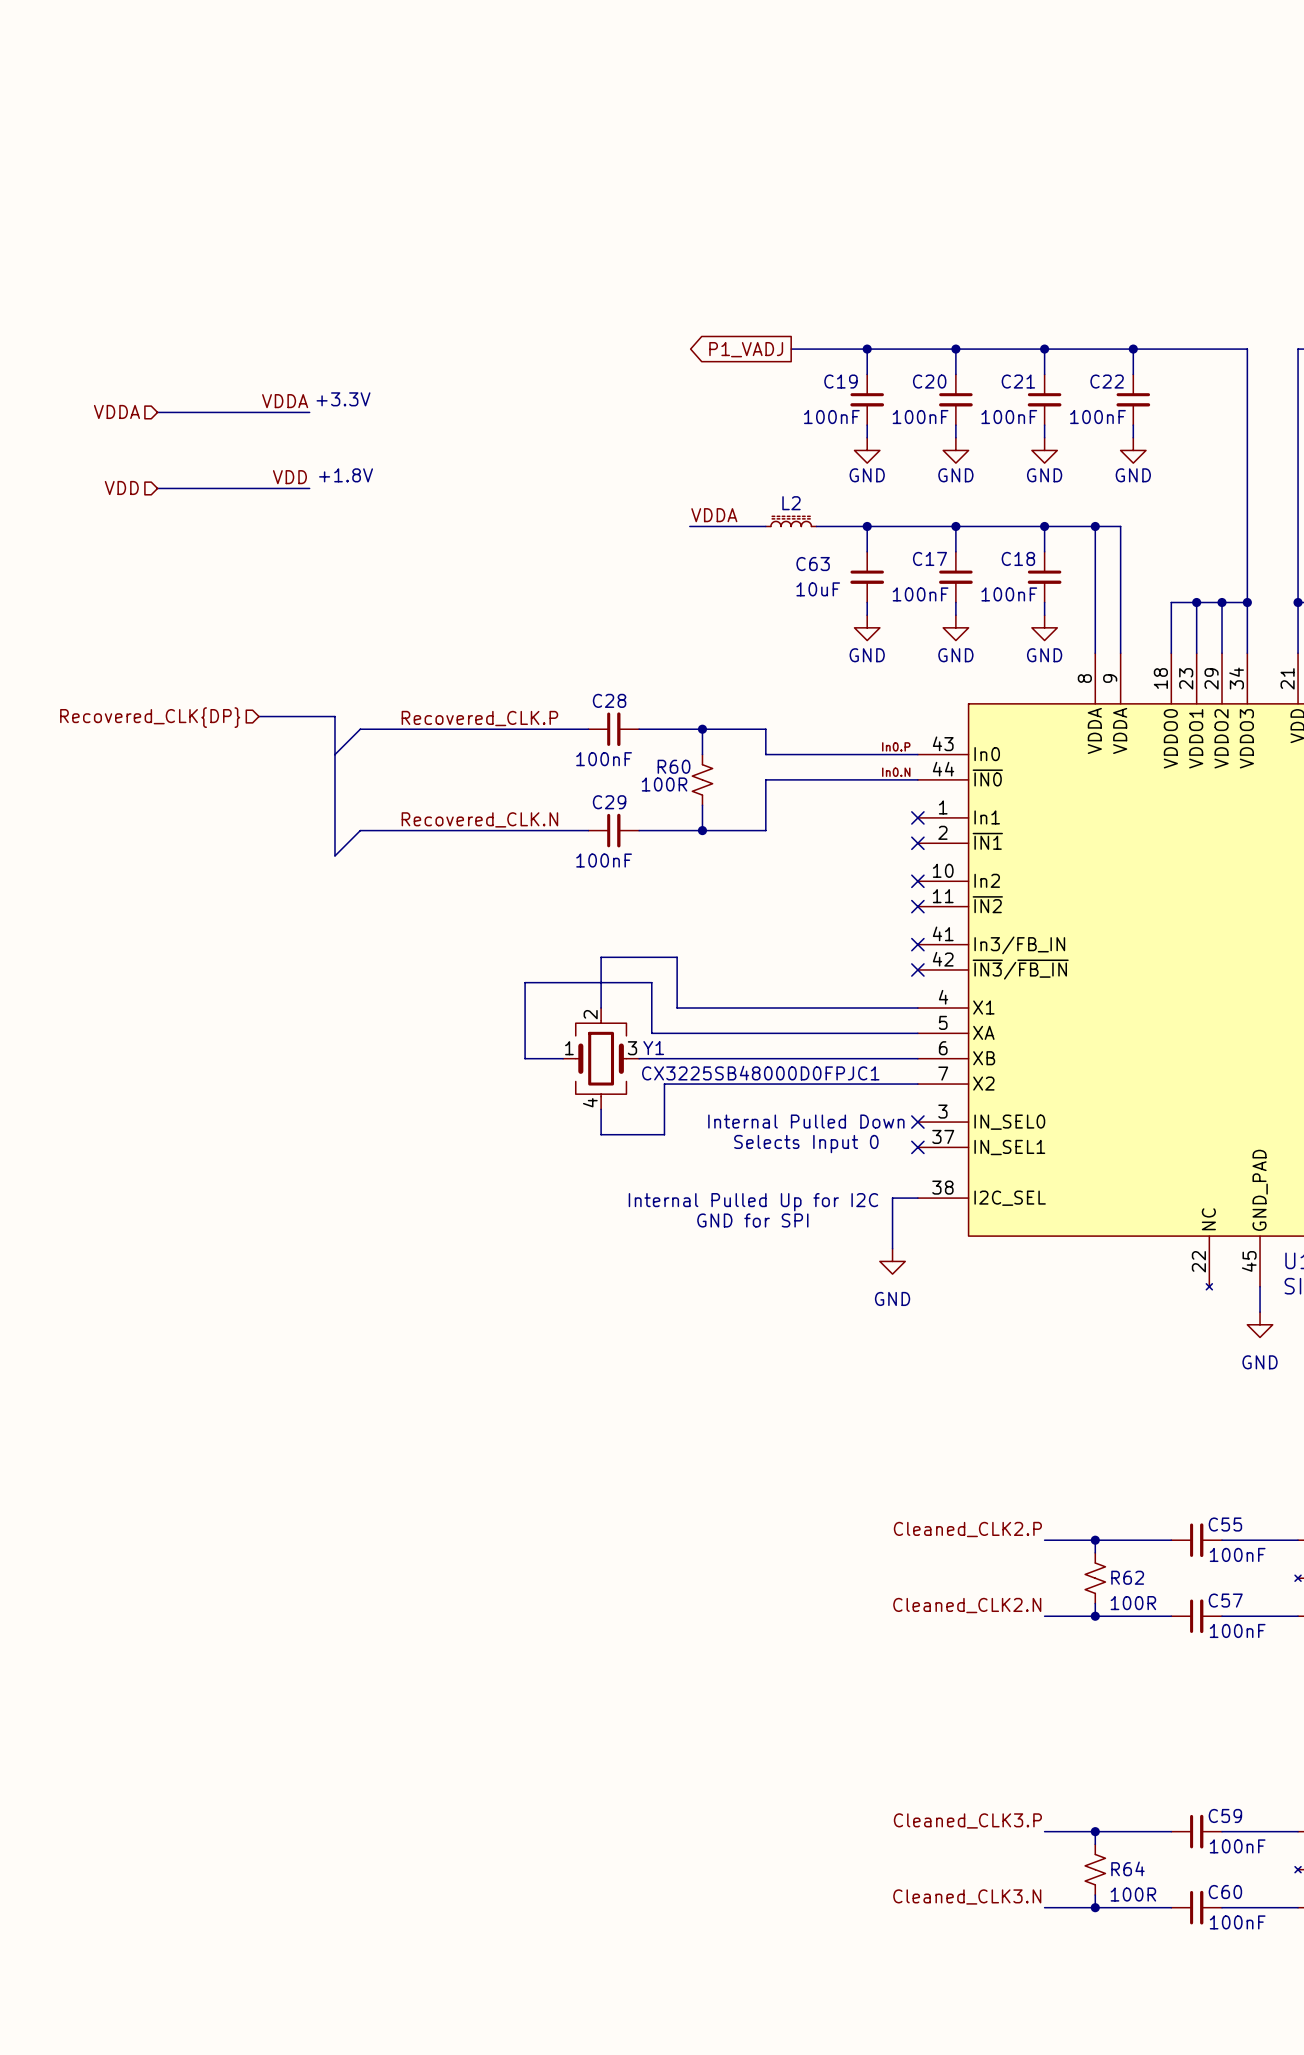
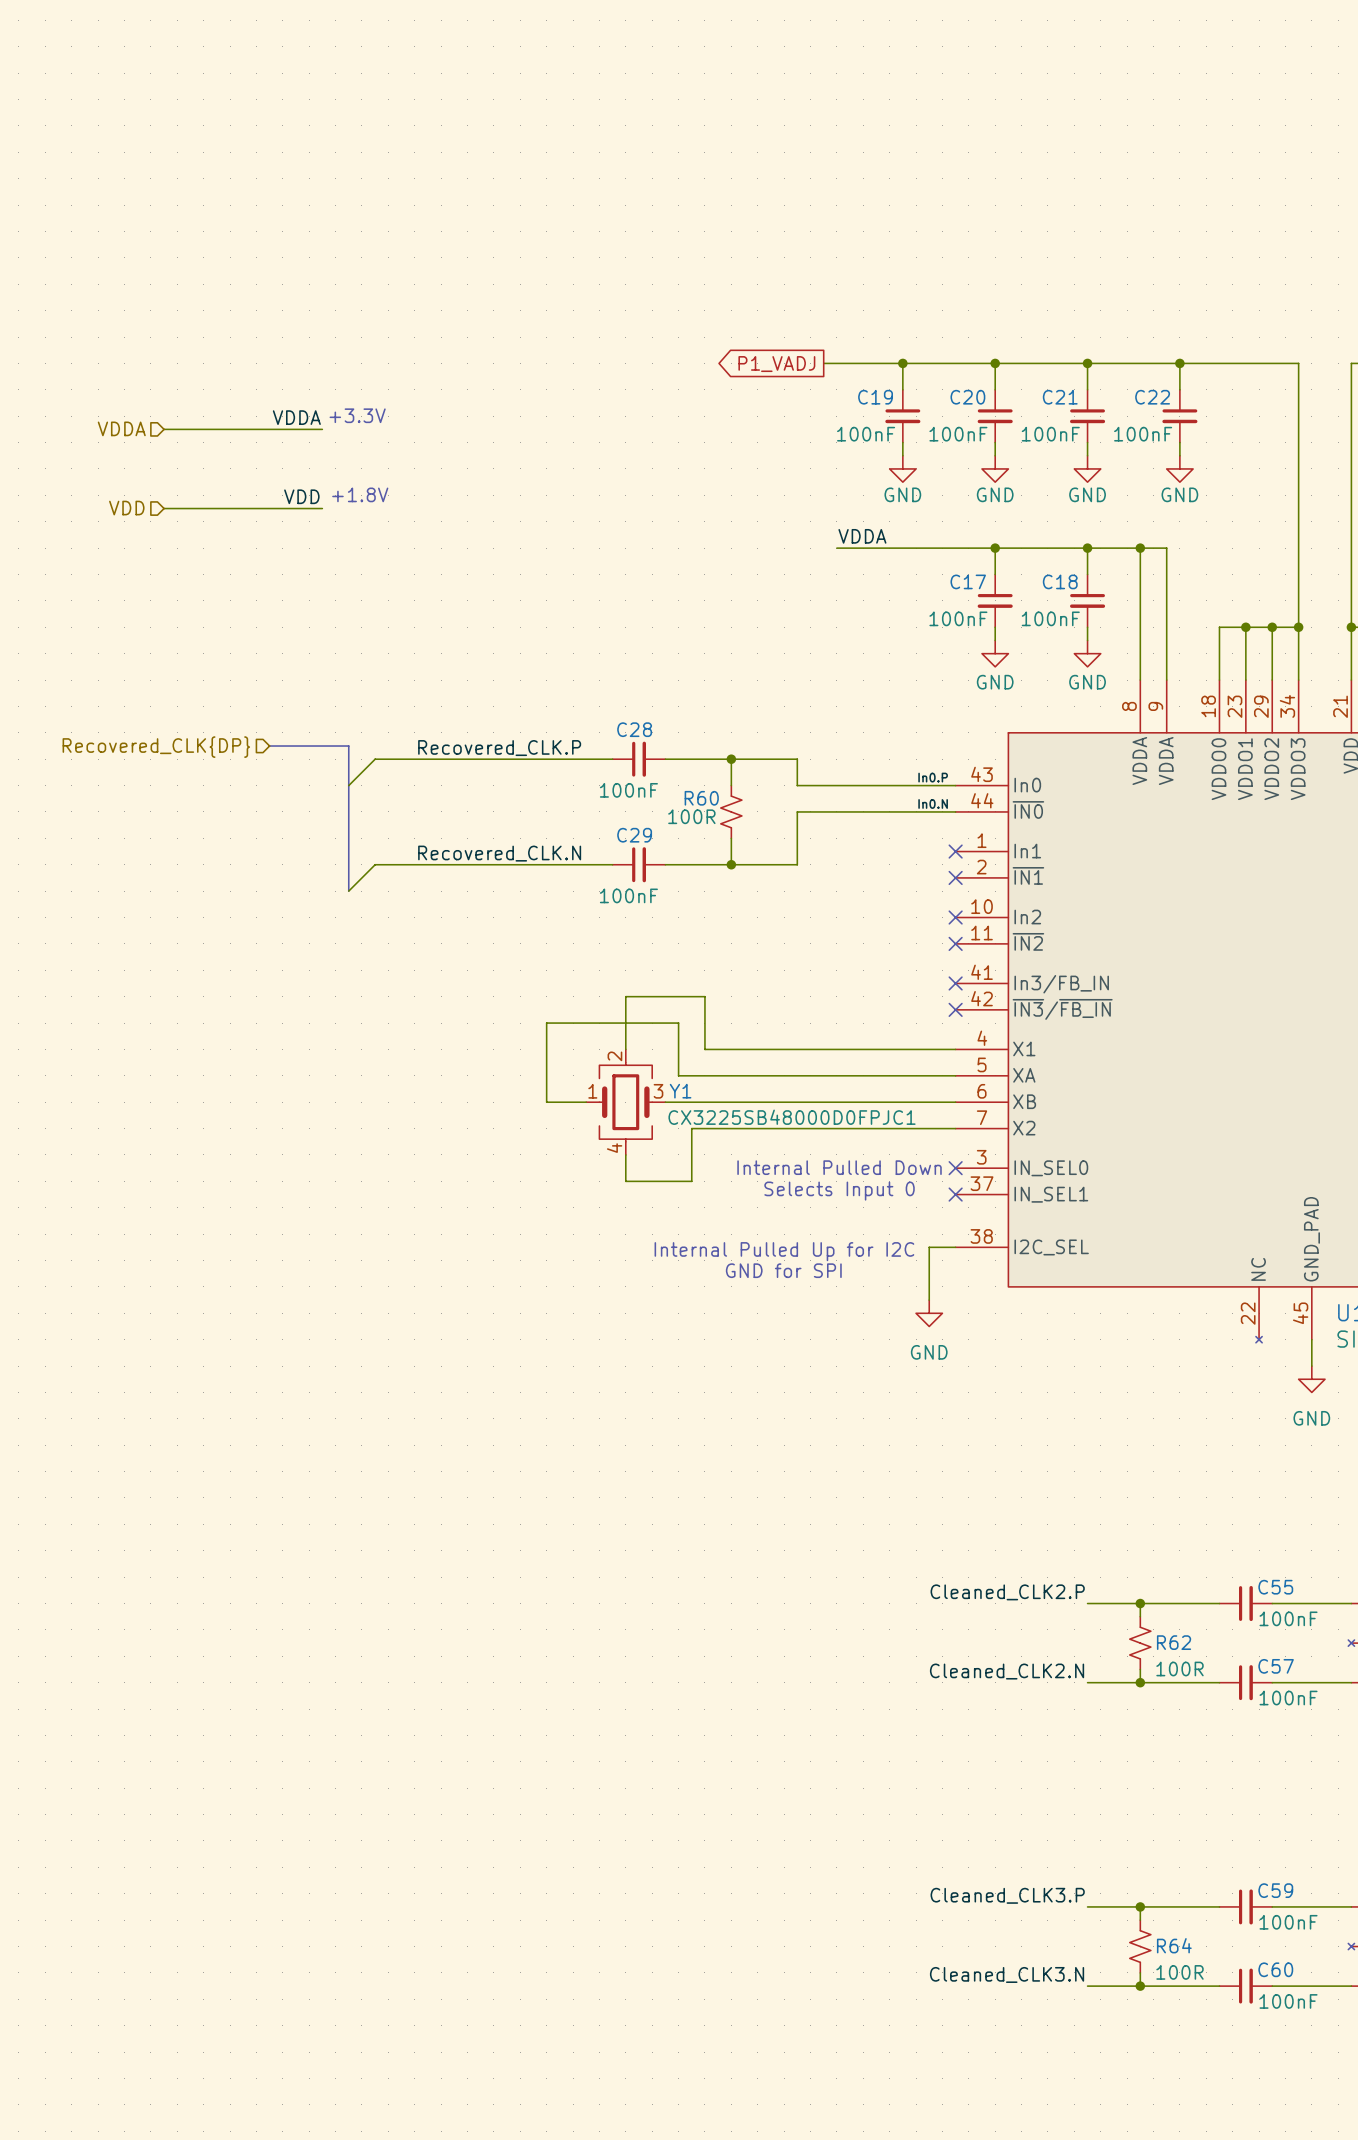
label position: VDDA (714, 515) -> VDDA (862, 536)
L2: (791, 521) -> none
wire: (689, 526) (765, 526) -> none
wire: none -> (836, 548) (850, 548)
wire: (867, 526) (867, 551) -> none
junction: (867, 526) -> none
C63: 10uF (867, 577) -> none
wire: (867, 602) (867, 615) -> none
power symbol: GND (867, 627) -> none

